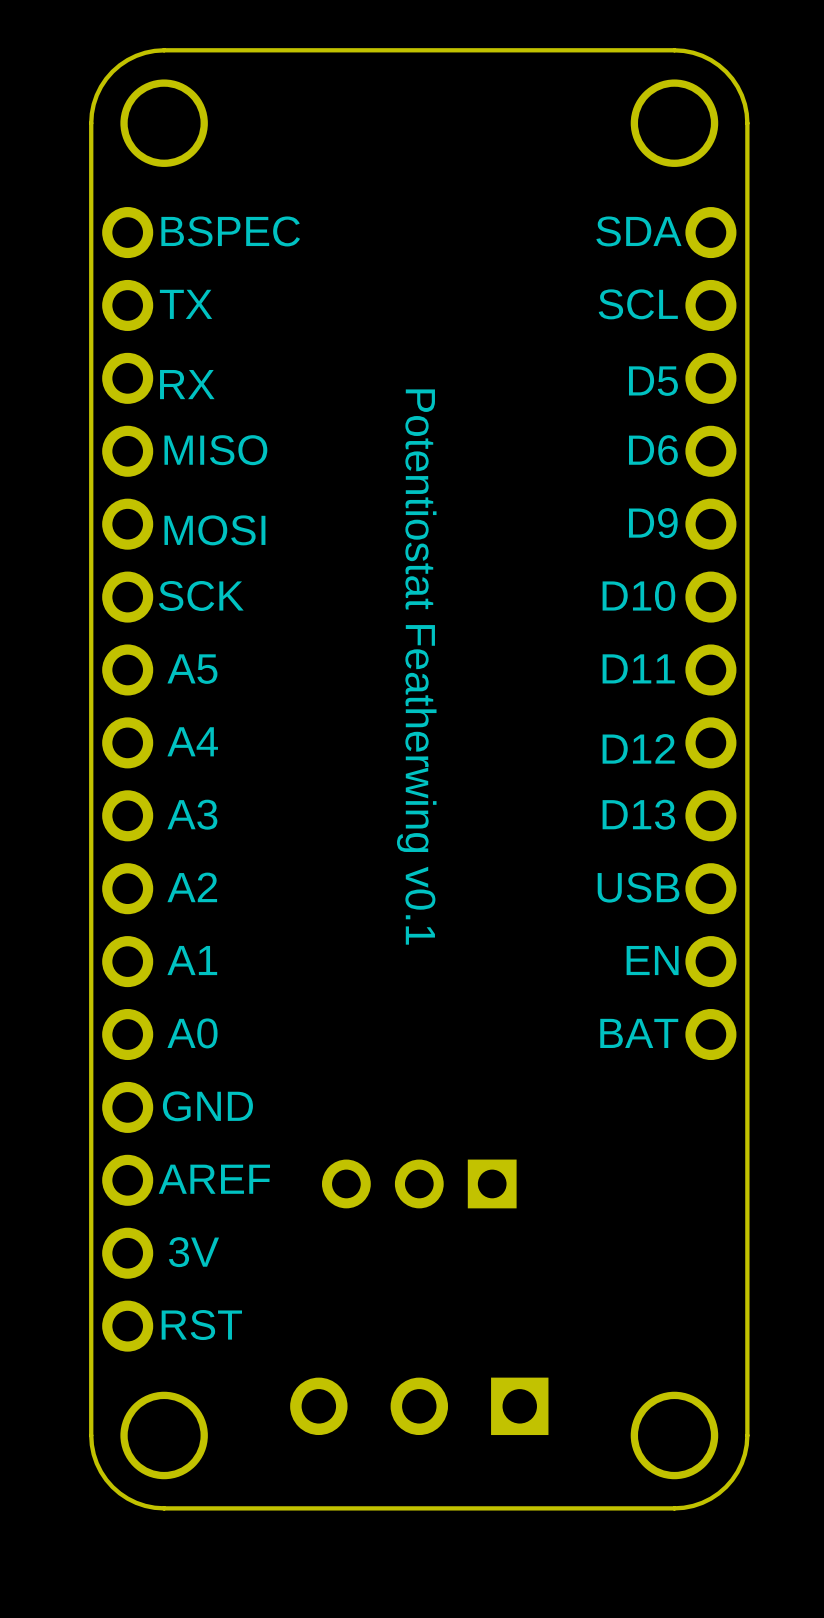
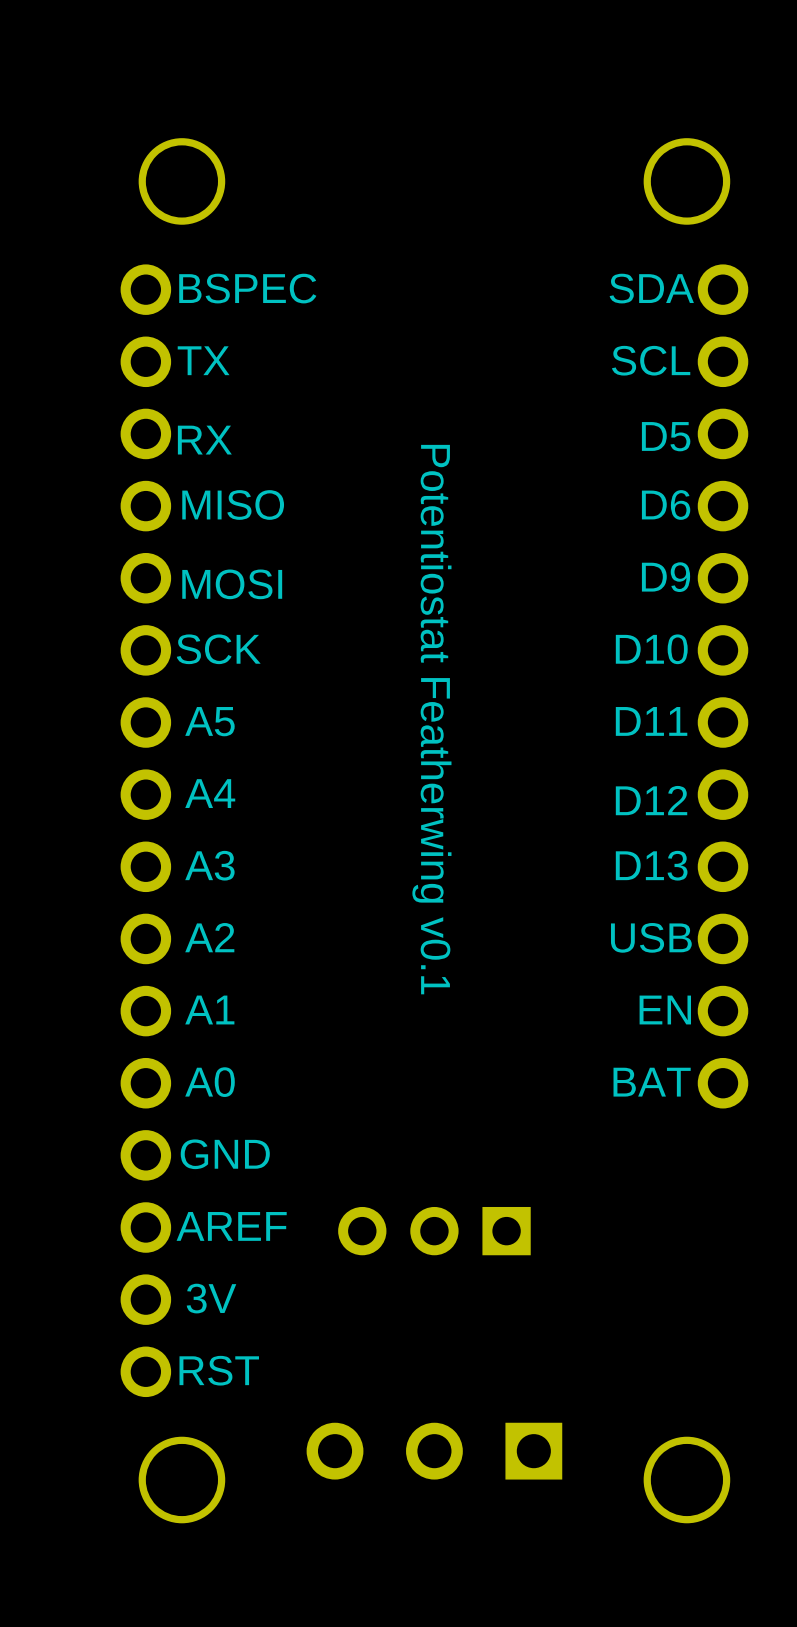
board edge: (674, 50) (154, 50) (136, 55) (119, 65) (106, 78) (96, 95) (91, 123) (91, 1435) (93, 1454) (100, 1471) (112, 1487) (136, 1502) (164, 1508) (674, 1508) (693, 1505) (718, 1493) (732, 1479) (741, 1463) (747, 1435) (747, 123) (741, 95) (726, 71) (702, 55) (674, 50) -> none

